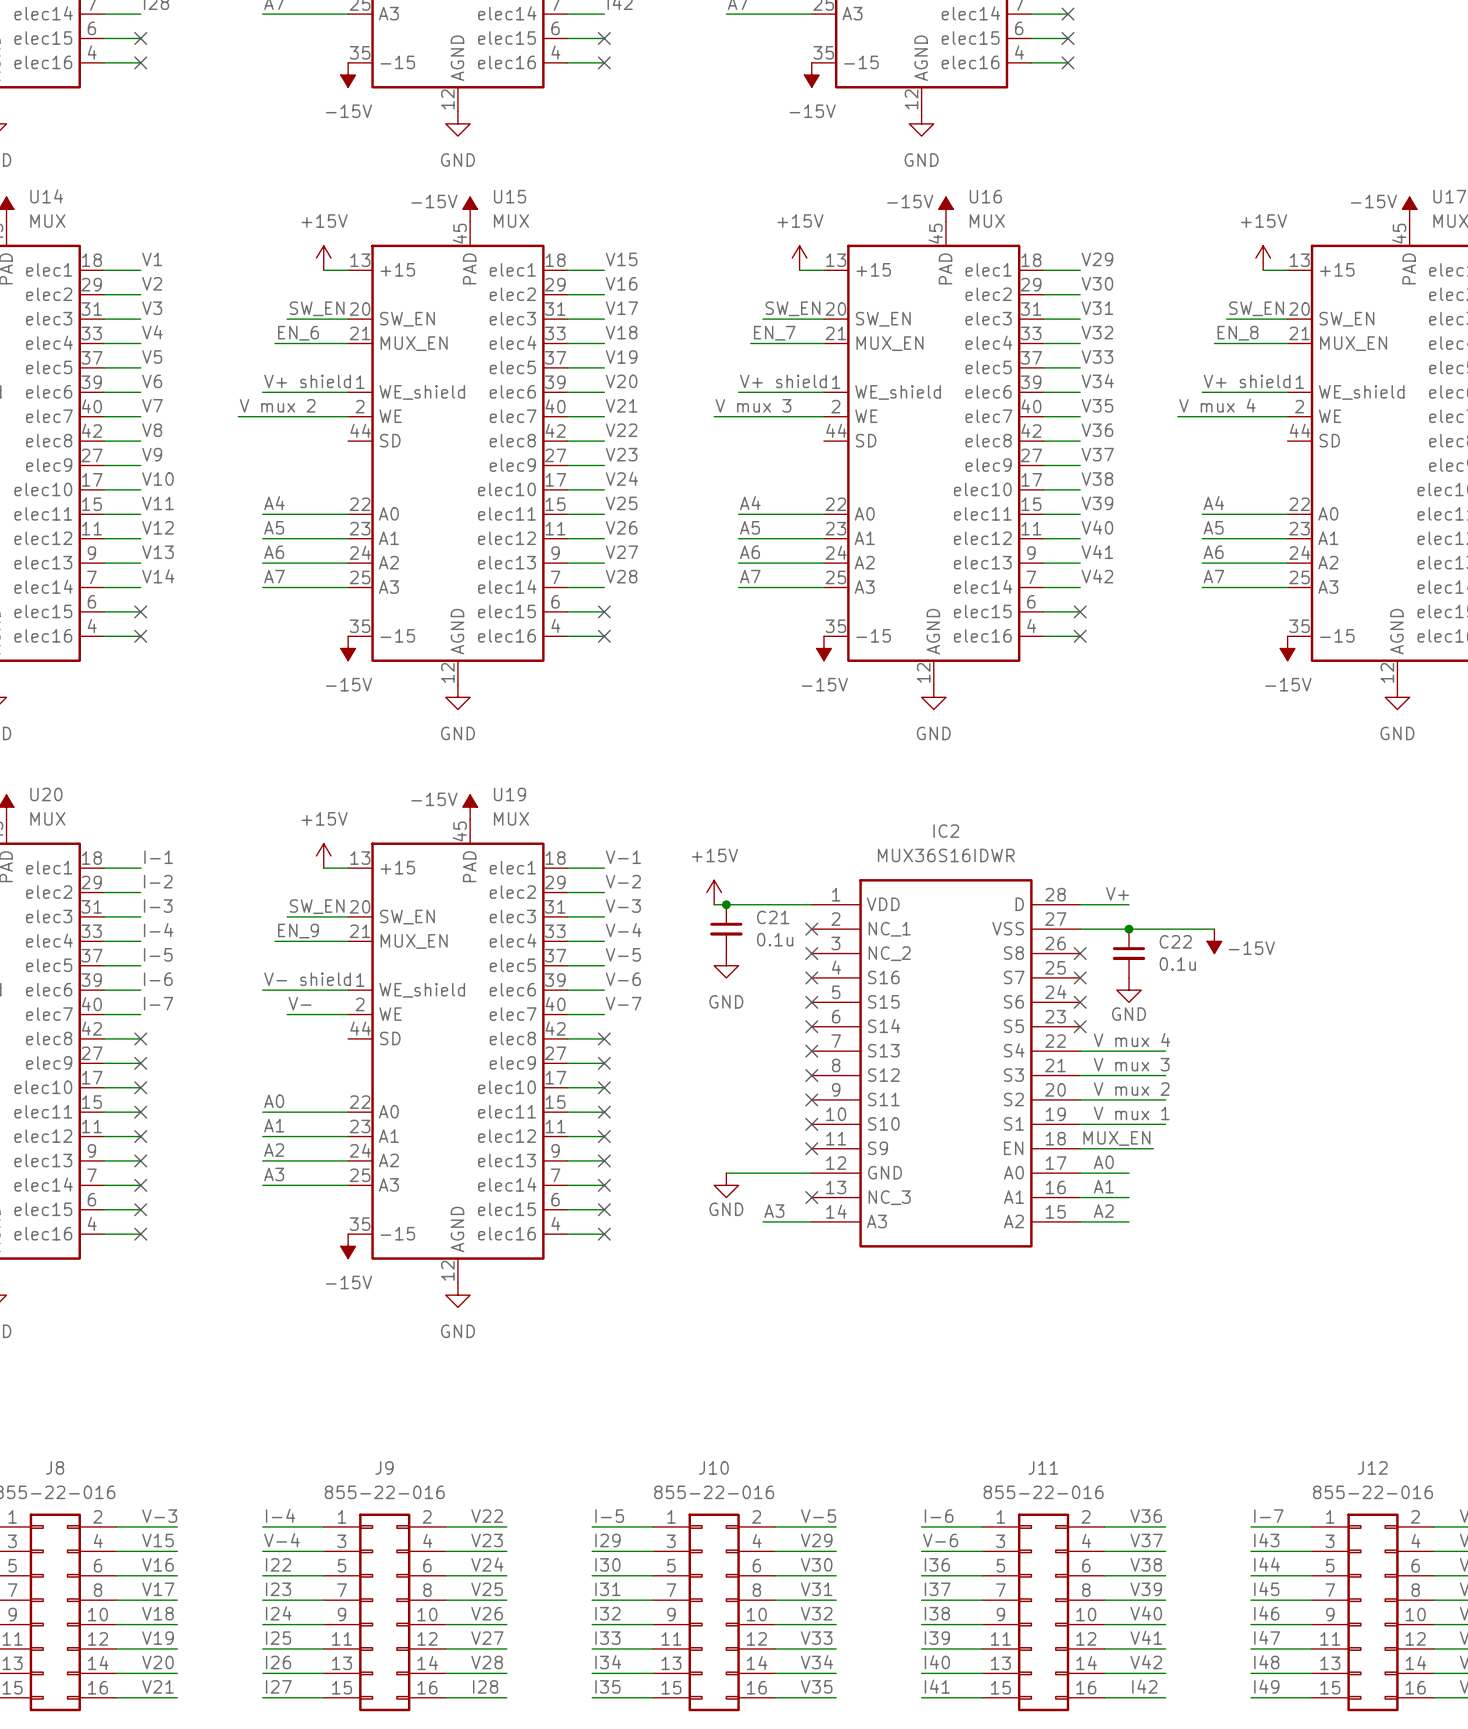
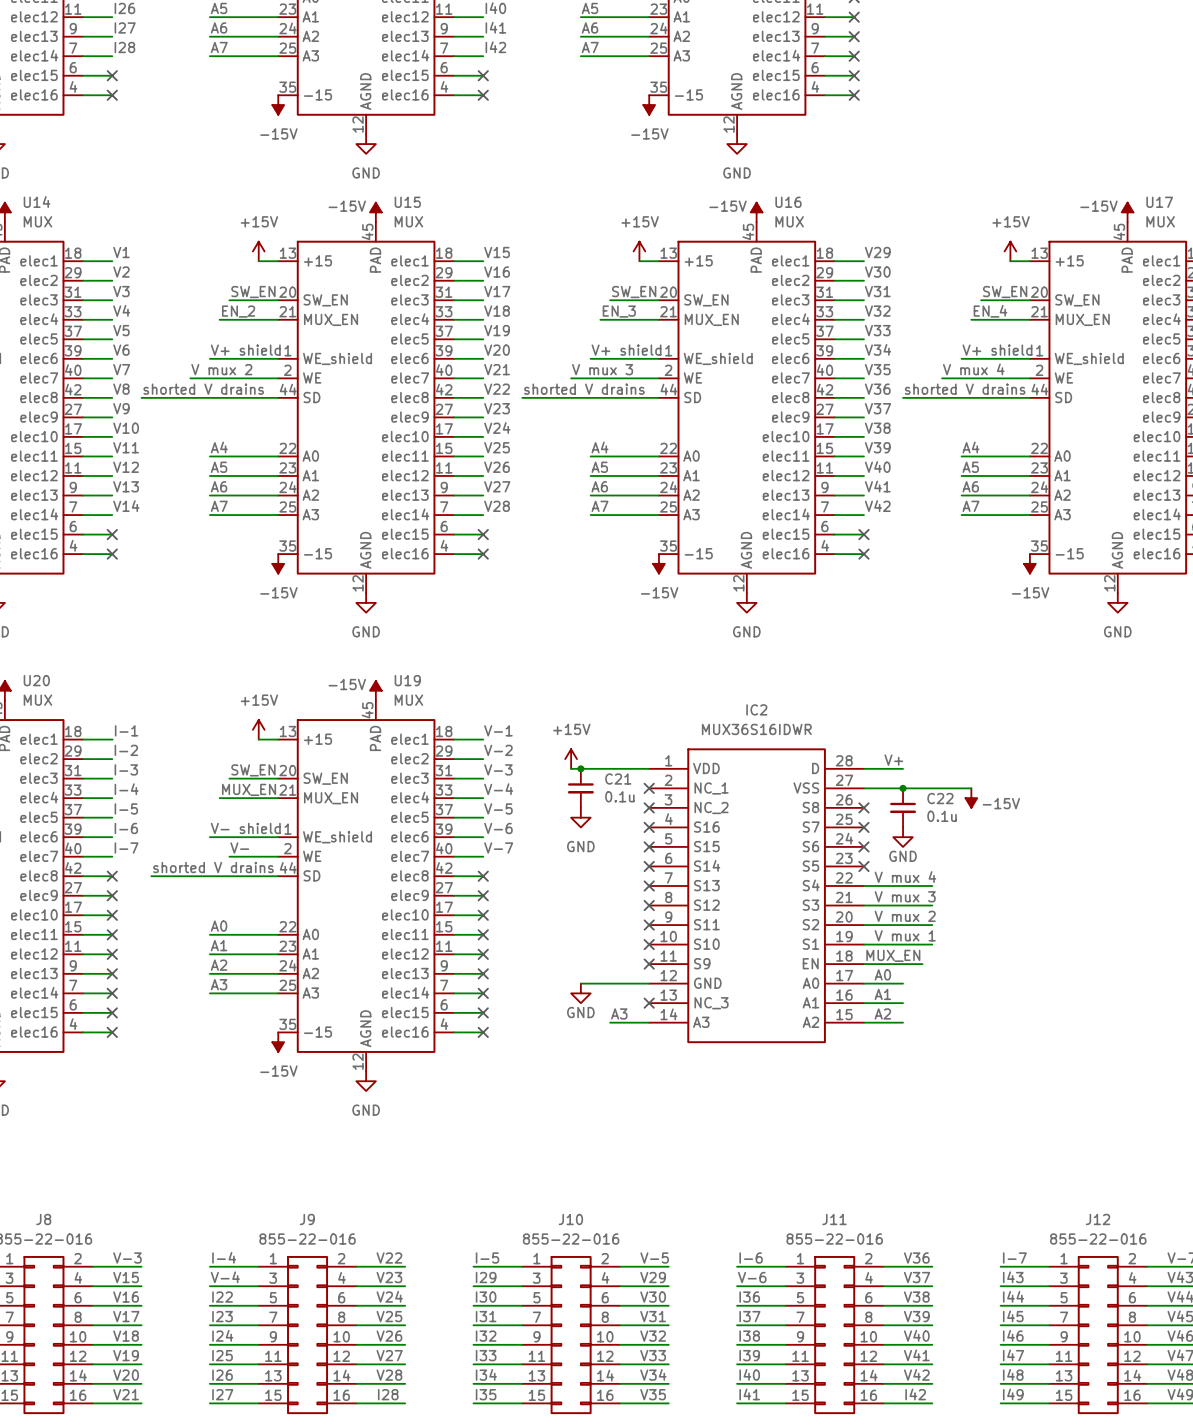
label: EN_6 (298, 333) -> EN_2 (238, 311)
label: EN_7 (774, 333) -> EN_3 (619, 311)
label: EN_8 (1238, 333) -> EN_4 (990, 311)
label: none -> shorted V drains (203, 389)
label: none -> shorted V drains (584, 389)
label: none -> shorted V drains (965, 389)
wire: none -> (141, 397) (278, 397)
wire: none -> (522, 397) (658, 397)
wire: none -> (903, 397) (1029, 397)
label: EN_9 (298, 931) -> MUX_EN (249, 789)
label: none -> shorted V drains (213, 867)
wire: none -> (151, 876) (278, 876)

